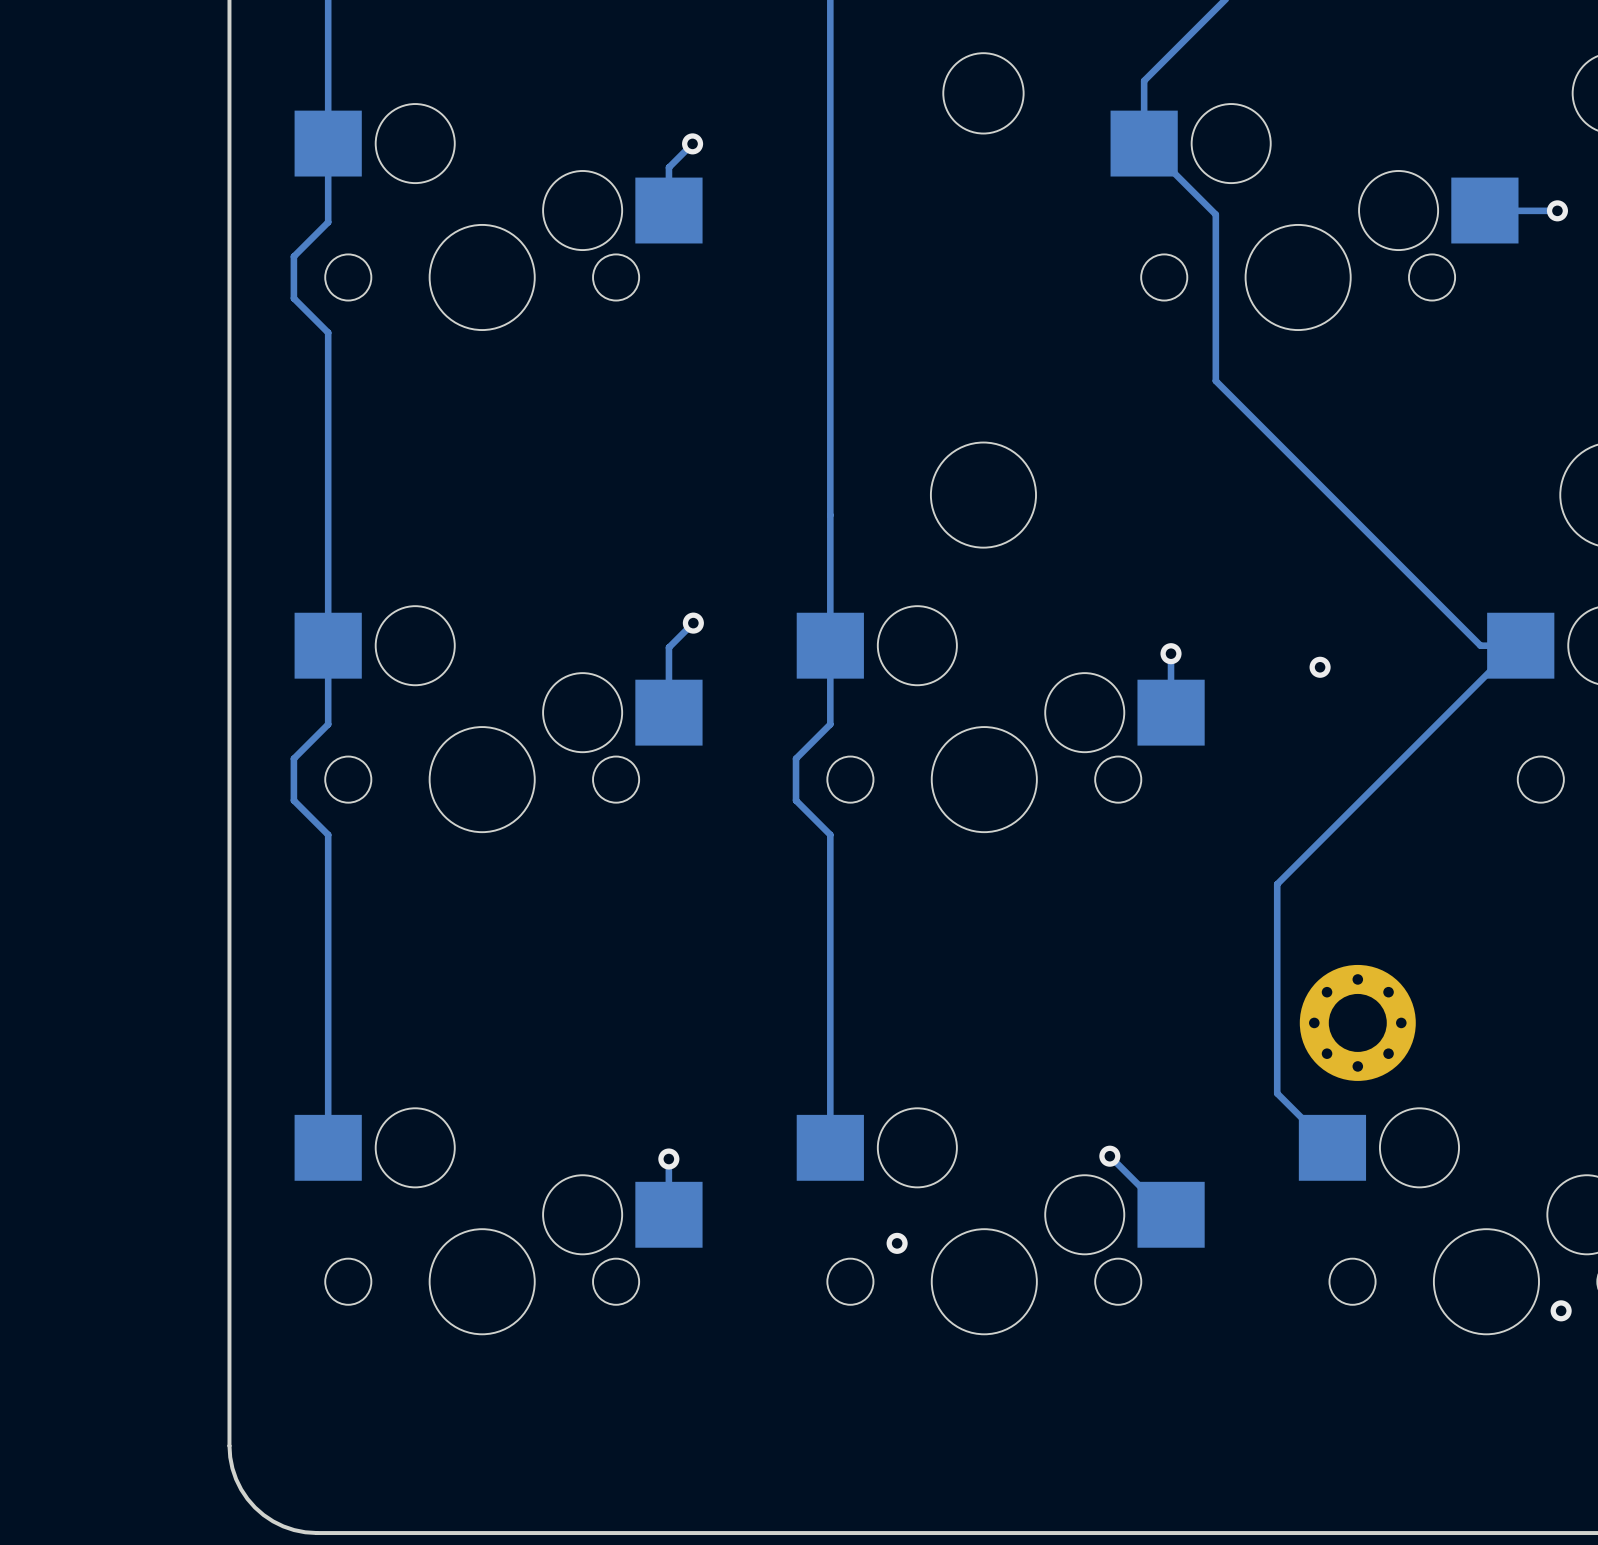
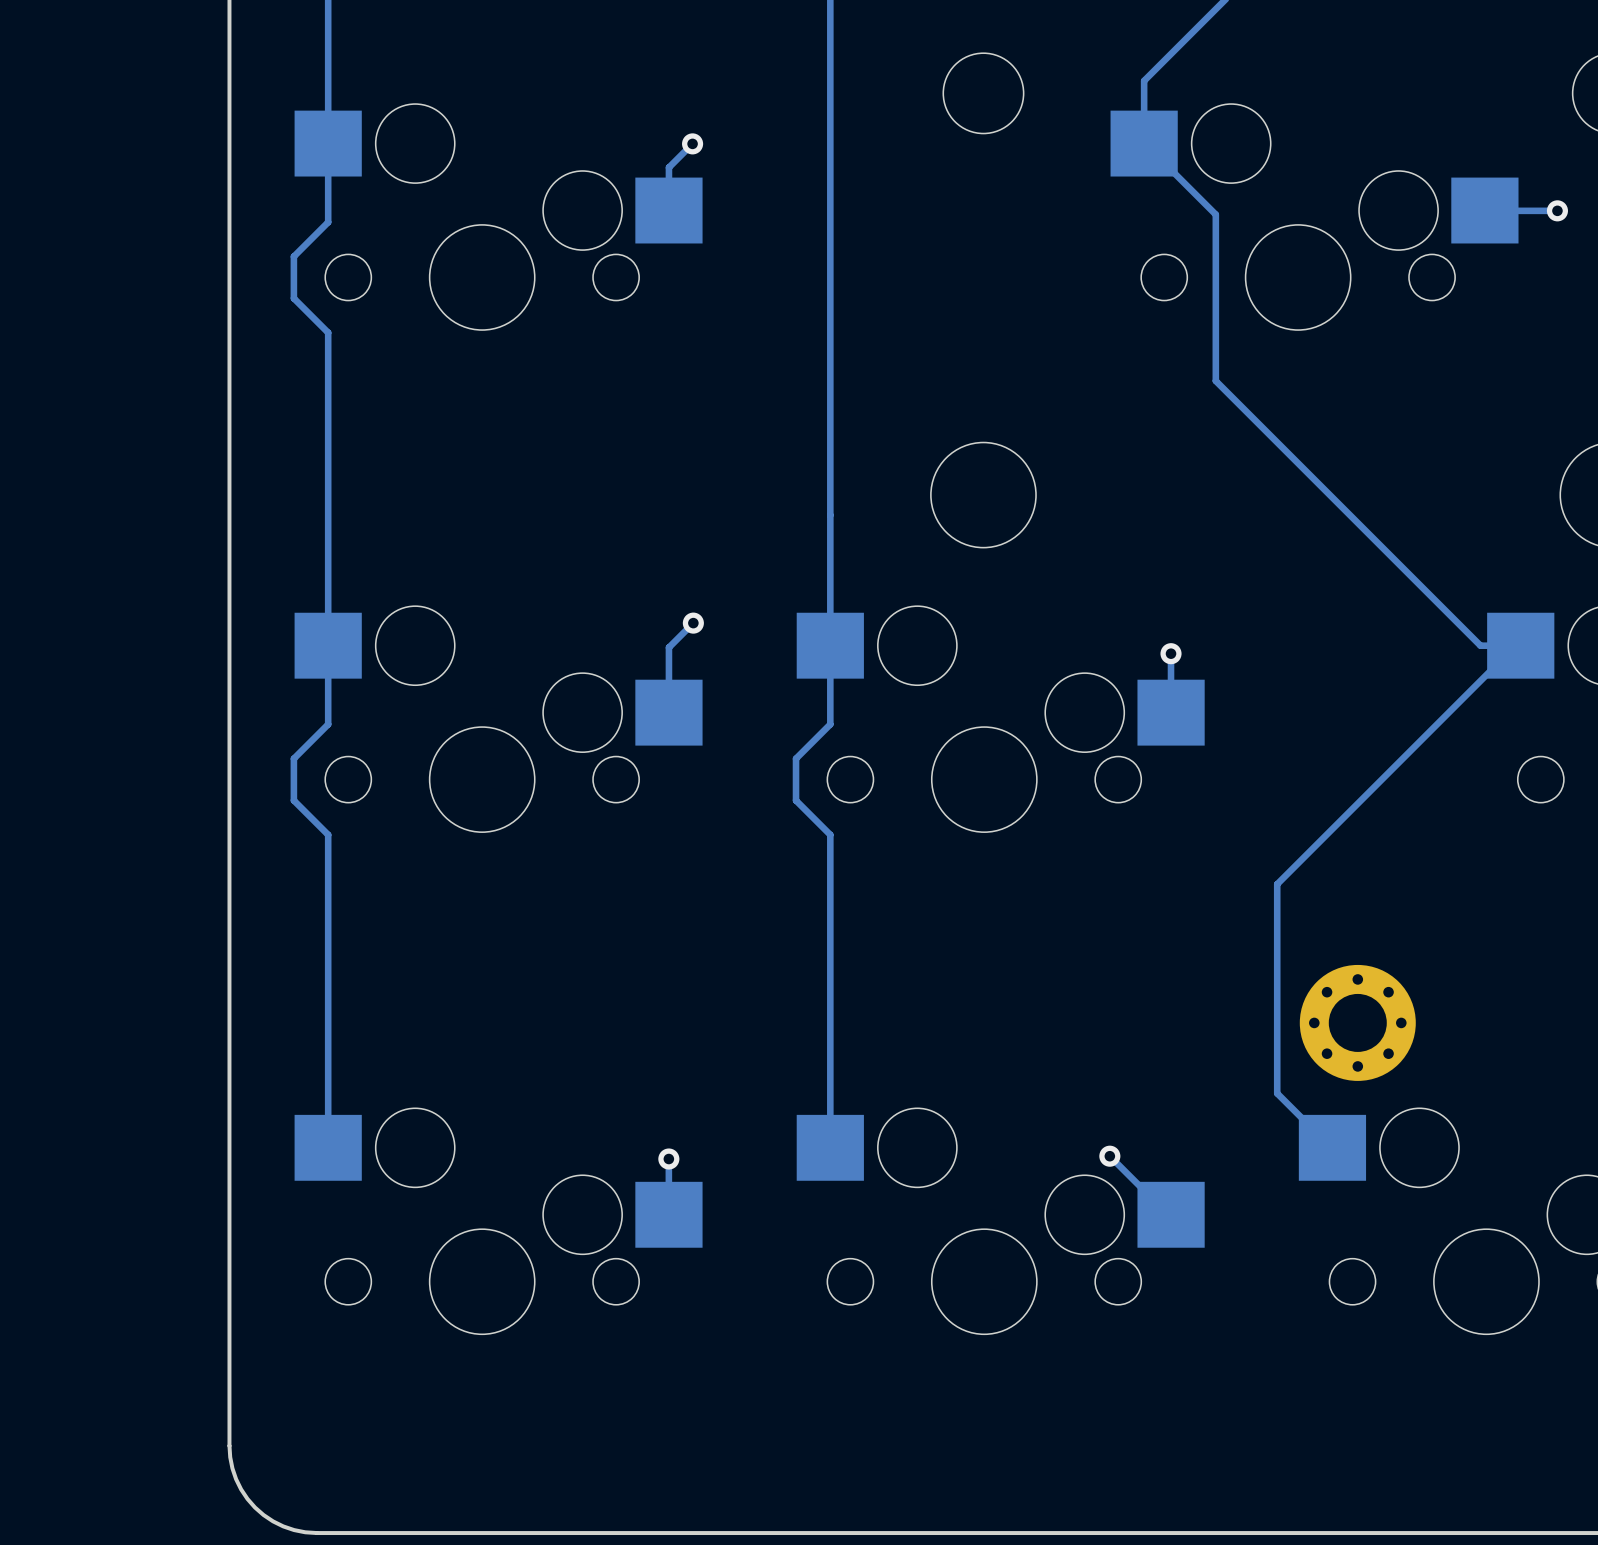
via: (1320, 667) -> none
via: (897, 1243) -> none
via: (1561, 1310) -> none

